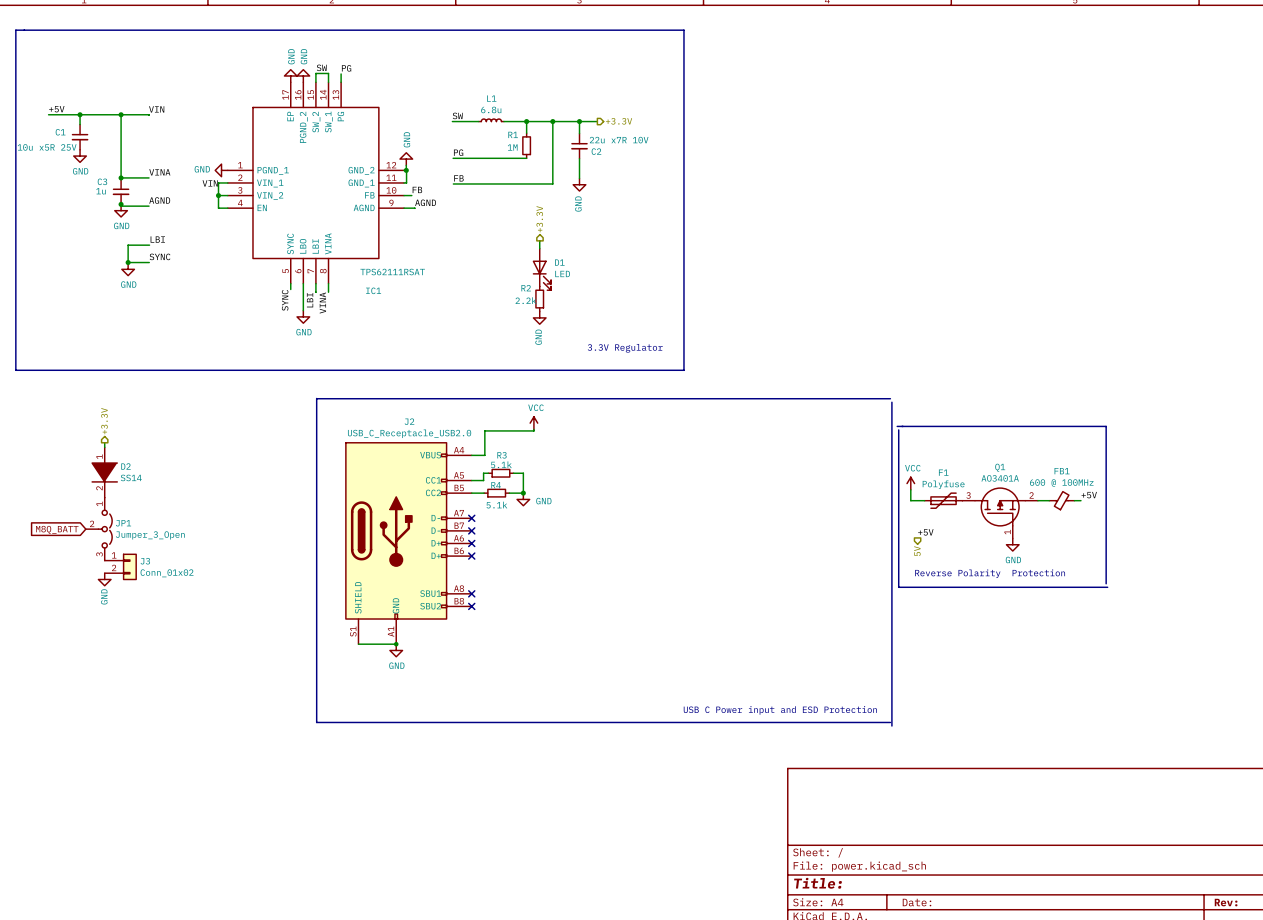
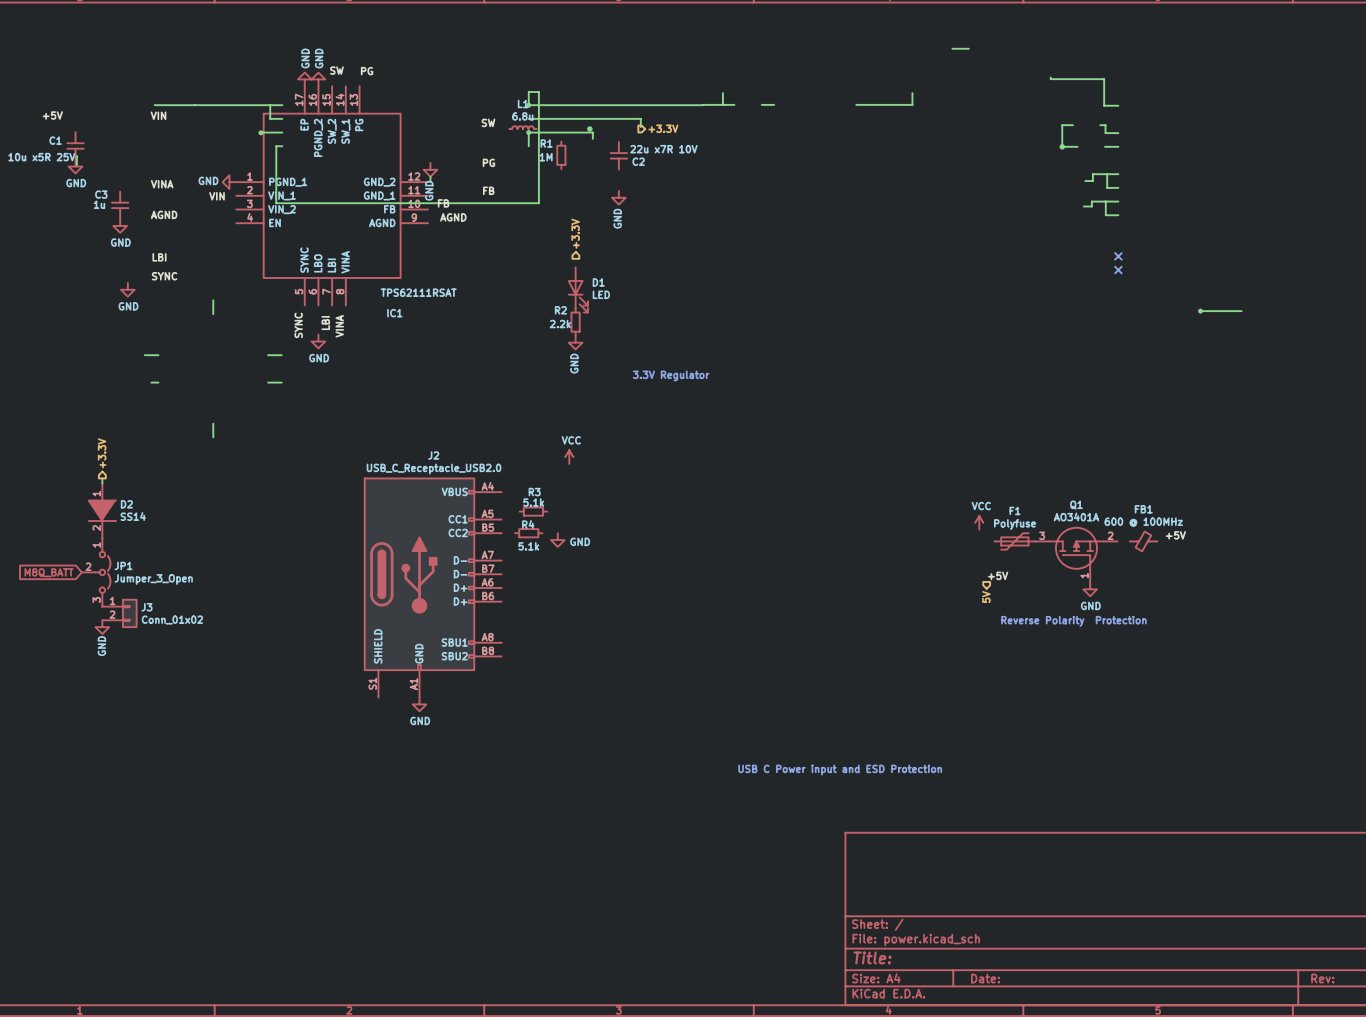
line: (15, 30) (683, 30) (683, 370) (15, 370) (15, 30) -> none
wire: none -> (952, 48) (968, 48)
wire: (341, 73) (341, 82) -> none
wire: none -> (1050, 77) (1050, 79) (1104, 79) (1104, 105) (1118, 105)
wire: (315, 82) (315, 73) (328, 73) (328, 82) -> none
wire: none -> (722, 93) (722, 104)
wire: none -> (912, 93) (912, 104) (856, 104)
wire: none -> (154, 105) (282, 105)
wire: none -> (270, 105) (270, 118) (282, 118)
junction: none -> (528, 105)
wire: none -> (734, 104) (703, 105) (528, 105) (528, 92) (538, 92) (538, 203) (276, 203) (276, 146) (282, 146)
wire: none -> (761, 104) (774, 104)
wire: none -> (528, 118) (640, 118) (640, 127)
wire: (48, 114) (148, 115) -> none
wire: (80, 114) (80, 124) -> none
junction: (80, 114) -> none
wire: (121, 114) (121, 179) -> none
junction: (121, 114) -> none
wire: none -> (1072, 125) (1062, 125) (1062, 146) (1077, 146)
wire: none -> (1100, 125) (1105, 125) (1105, 133) (1118, 133)
wire: (452, 121) (478, 121) -> none
wire: (503, 121) (597, 121) -> none
wire: (526, 121) (526, 133) -> none
junction: (526, 121) -> none
wire: (552, 121) (552, 183) (453, 183) -> none
wire: (579, 121) (579, 133) -> none
junction: (579, 121) -> none
wire: none -> (282, 132) (260, 132)
junction: none -> (528, 132)
junction: none -> (260, 132)
wire: none -> (592, 138) (592, 132) (528, 132) (528, 146)
junction: none -> (1062, 146)
wire: none -> (1104, 146) (1118, 146)
wire: none -> (77, 156) (76, 164)
wire: (453, 158) (526, 158) -> none
wire: (579, 158) (579, 178) -> none
power symbol rotation: 0° (406, 159) -> 180° (430, 169)
wire: none -> (1107, 174) (1107, 187) (1118, 187)
wire: none -> (1118, 174) (1092, 174) (1092, 181) (1085, 181)
junction: (406, 170) -> none
wire: (121, 177) (149, 177) -> none
junction: (121, 177) -> none
wire: (227, 182) (218, 182) (218, 208) (227, 208) -> none
wire: none -> (1105, 201) (1105, 215) (1118, 215)
wire: none -> (1118, 201) (1091, 201) (1091, 206) (1083, 206)
wire: (218, 195) (227, 195) -> none
junction: (218, 195) -> none
wire: (404, 195) (411, 195) -> none
wire: (121, 204) (121, 206) (149, 206) -> none
junction: (121, 204) -> none
wire: (404, 208) (414, 208) -> none
no-connect mark: none -> (1118, 256)
wire: (539, 240) (539, 248) -> none
wire: (149, 245) (128, 245) (128, 263) -> none
no-connect mark: none -> (1118, 270)
wire: (128, 262) (149, 262) -> none
junction: (128, 262) -> none
wire: none -> (213, 300) (213, 314)
wire: (290, 283) (290, 289) -> none
wire: (303, 283) (303, 310) -> none
wire: (315, 283) (315, 292) -> none
wire: (328, 283) (328, 292) -> none
wire: none -> (1200, 311) (1241, 311)
junction: none -> (1200, 311)
wire: none -> (144, 355) (158, 355)
wire: none -> (268, 355) (281, 355)
wire: none -> (151, 382) (158, 382)
wire: none -> (268, 382) (281, 382)
wire: none -> (213, 423) (213, 437)
line: (316, 398) (316, 722) (890, 722) -> none
line: (316, 398) (890, 398) -> none
line: (891, 402) (891, 726) -> none
line: (897, 426) (1106, 426) (1106, 583) -> none
wire: (533, 429) (533, 430) (484, 430) (484, 455) (471, 455) -> none
line: (898, 429) (898, 587) (1107, 587) -> none
wire: (488, 473) (483, 473) (483, 480) (471, 480) -> none
wire: (513, 473) (523, 473) (523, 493) (509, 493) -> none
wire: (910, 489) (910, 500) (924, 500) -> none
wire: (471, 493) (484, 493) -> none
junction: (523, 493) -> none
wire: (1037, 500) (1049, 500) -> none
wire: (1074, 500) (1080, 500) -> none
no-connect mark: (471, 518) -> none
no-connect mark: (471, 530) -> none
no-connect mark: (471, 543) -> none
no-connect mark: (471, 556) -> none
no-connect mark: (471, 593) -> none
no-connect mark: (471, 606) -> none
wire: (358, 644) (396, 644) -> none
junction: (396, 644) -> none

